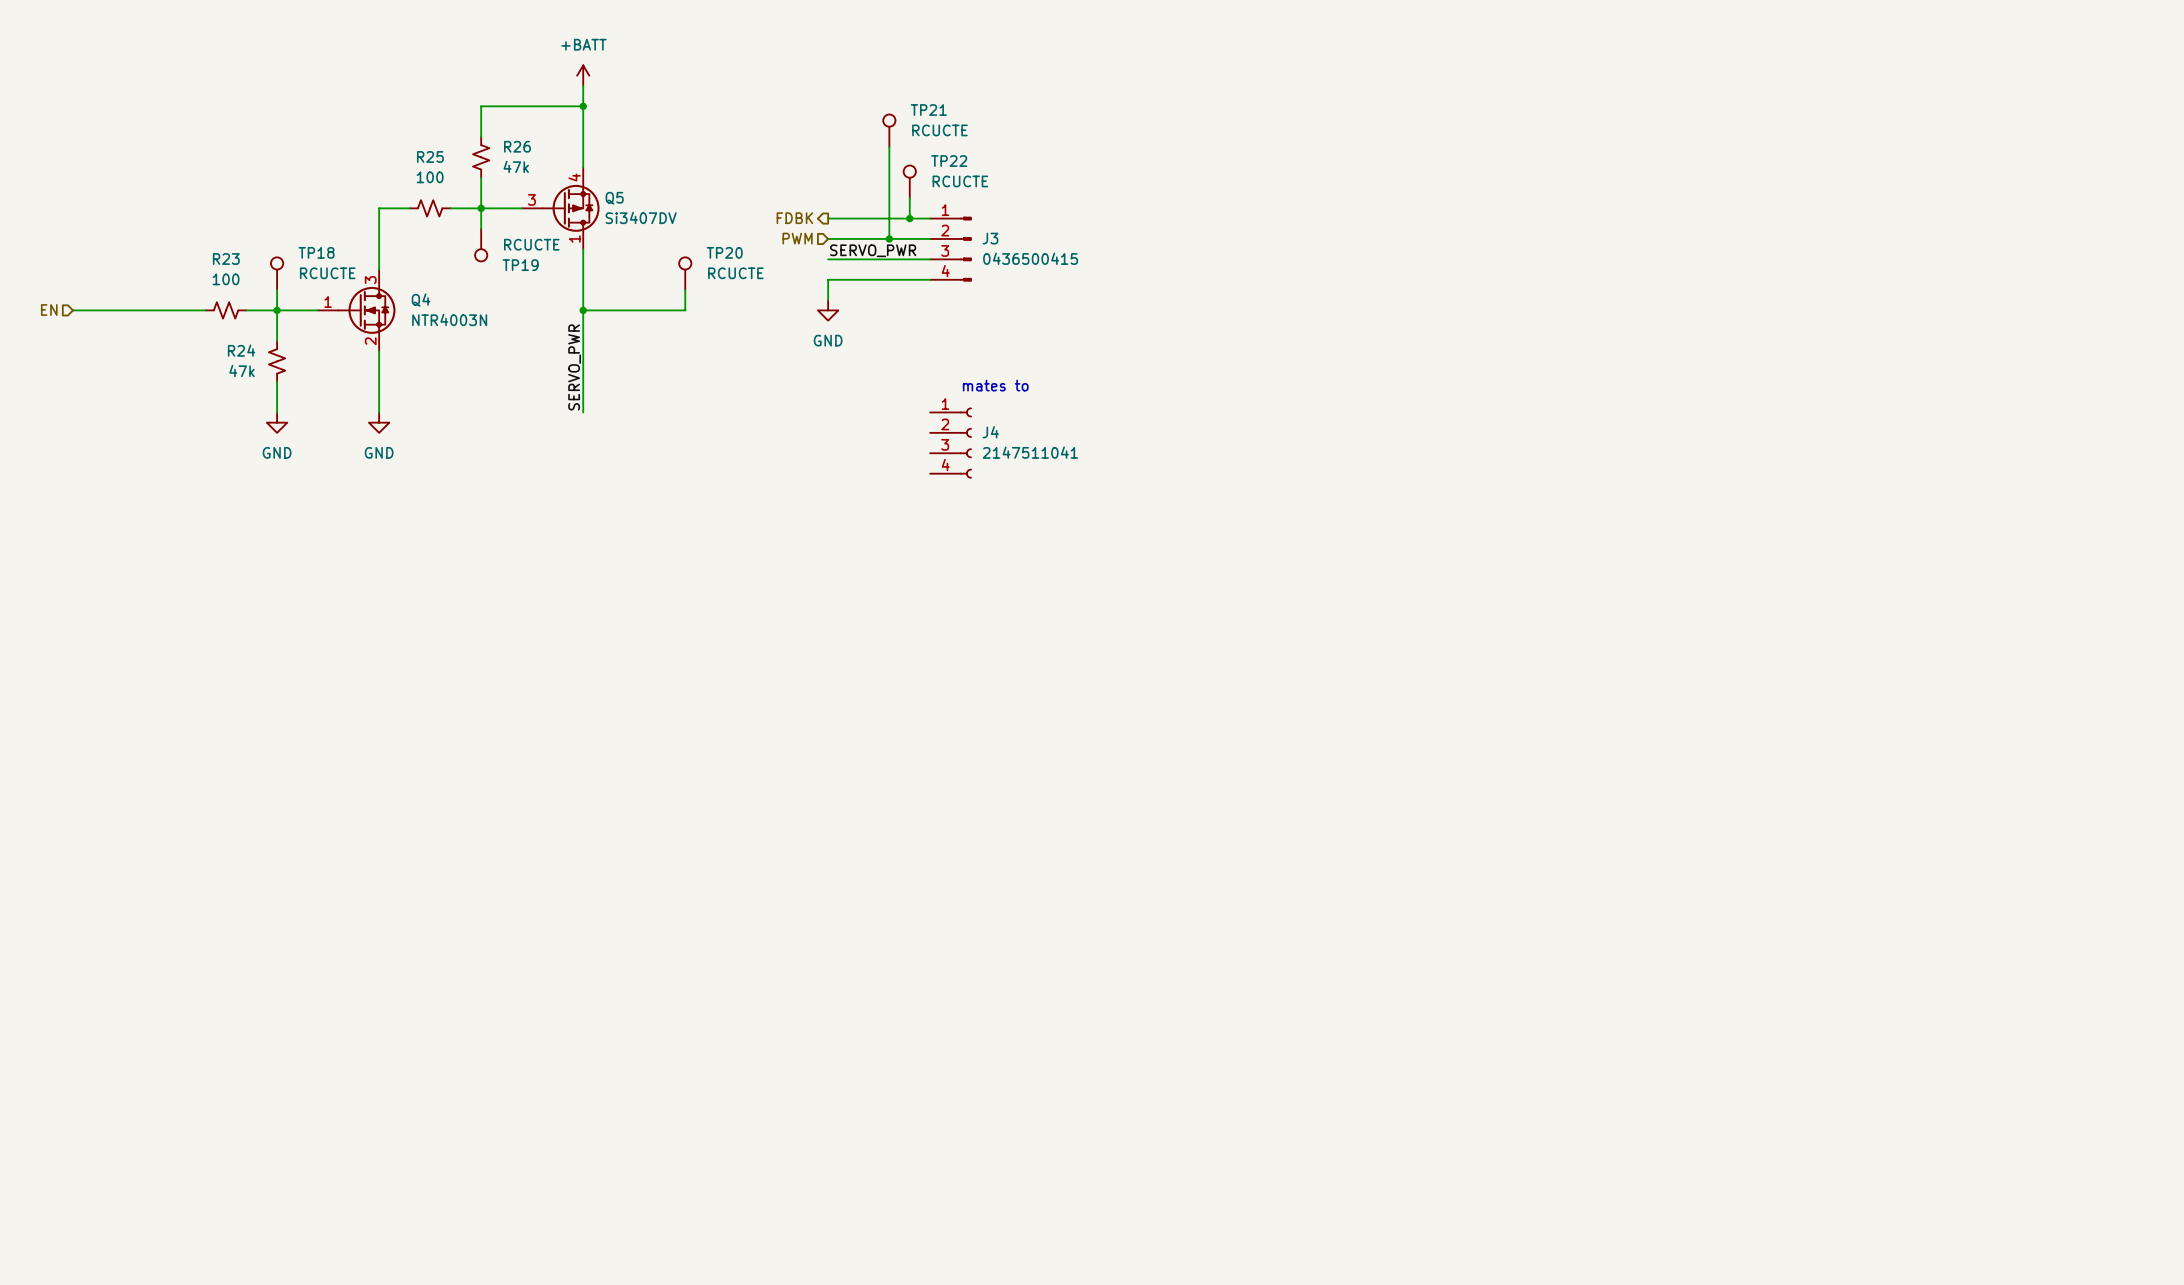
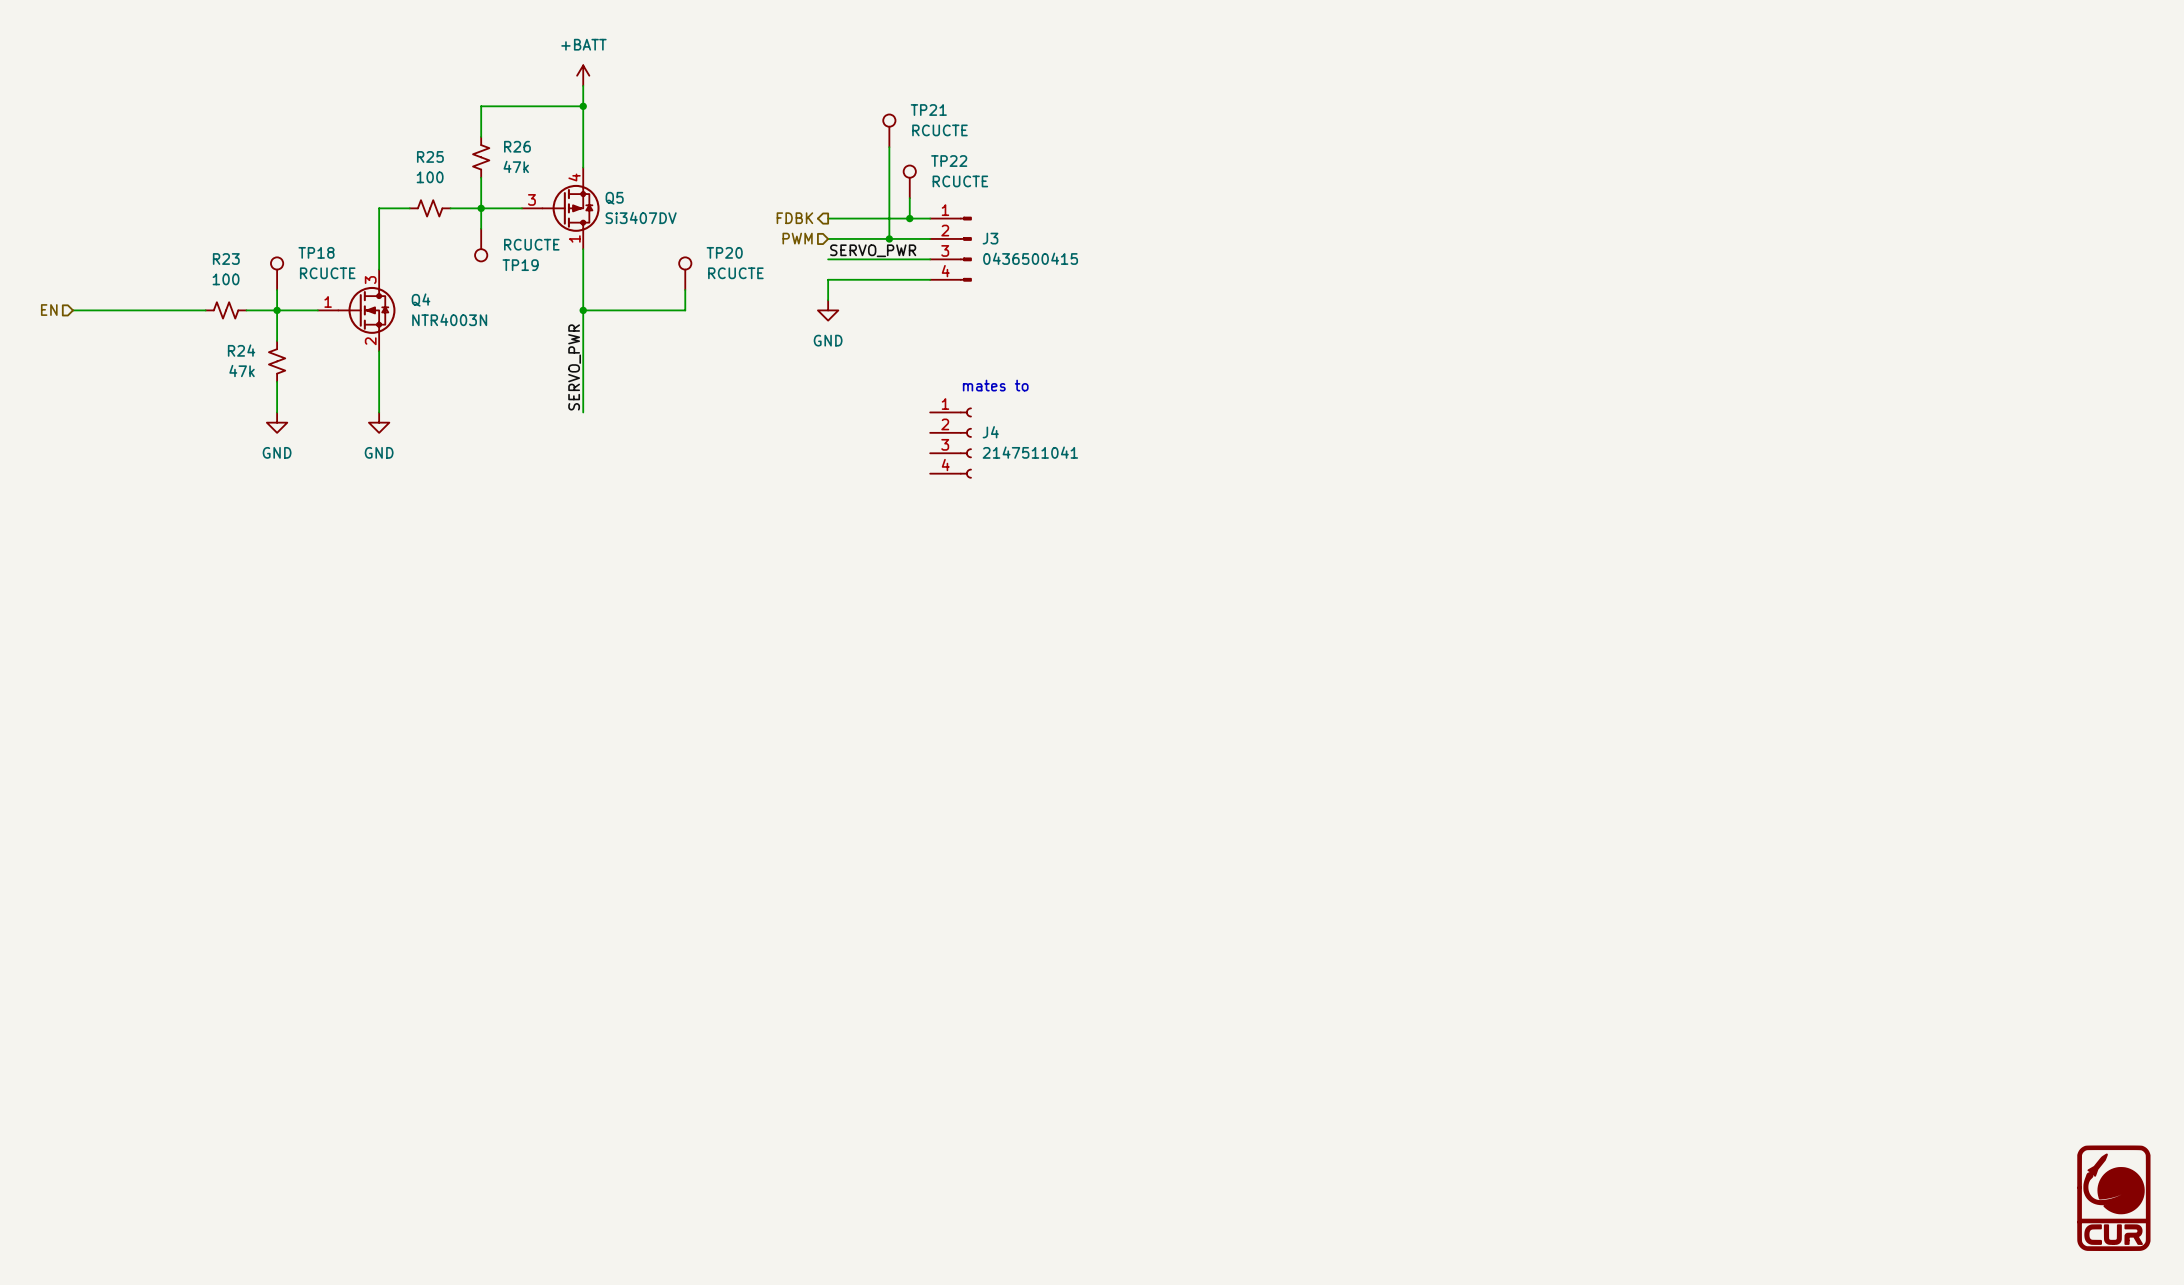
power symbol: none -> (2113, 1198)

